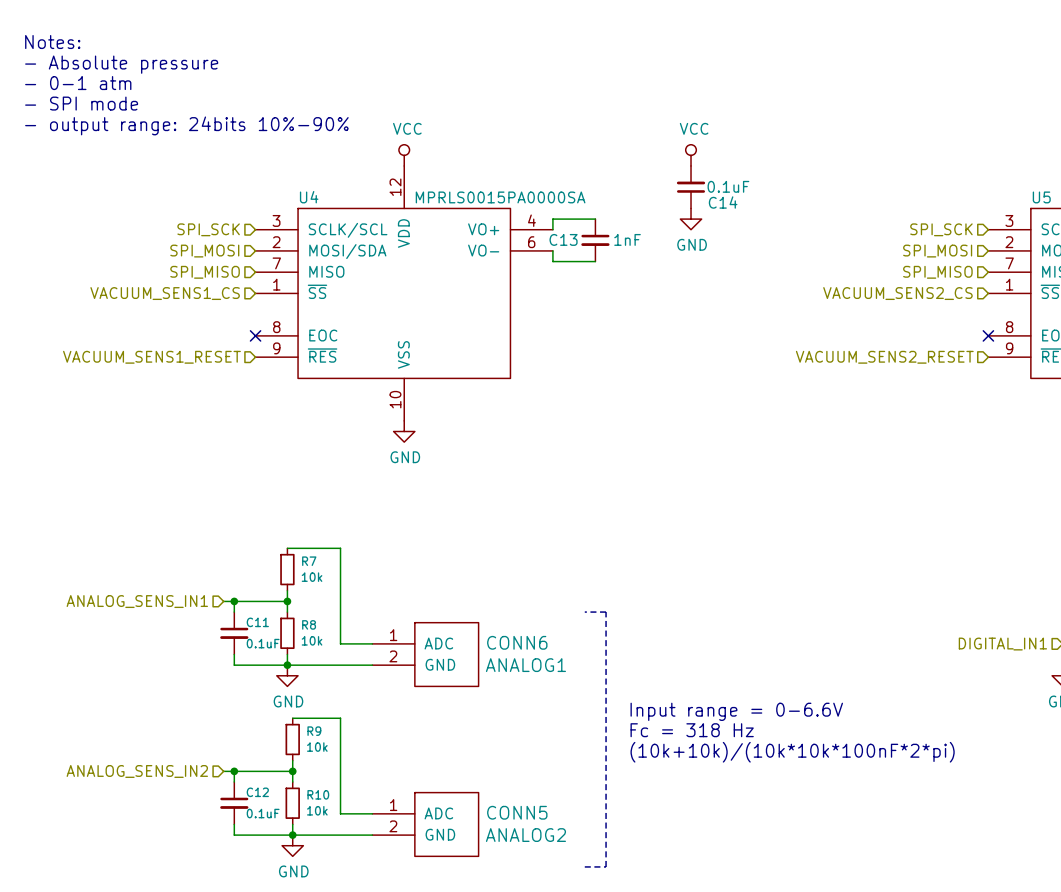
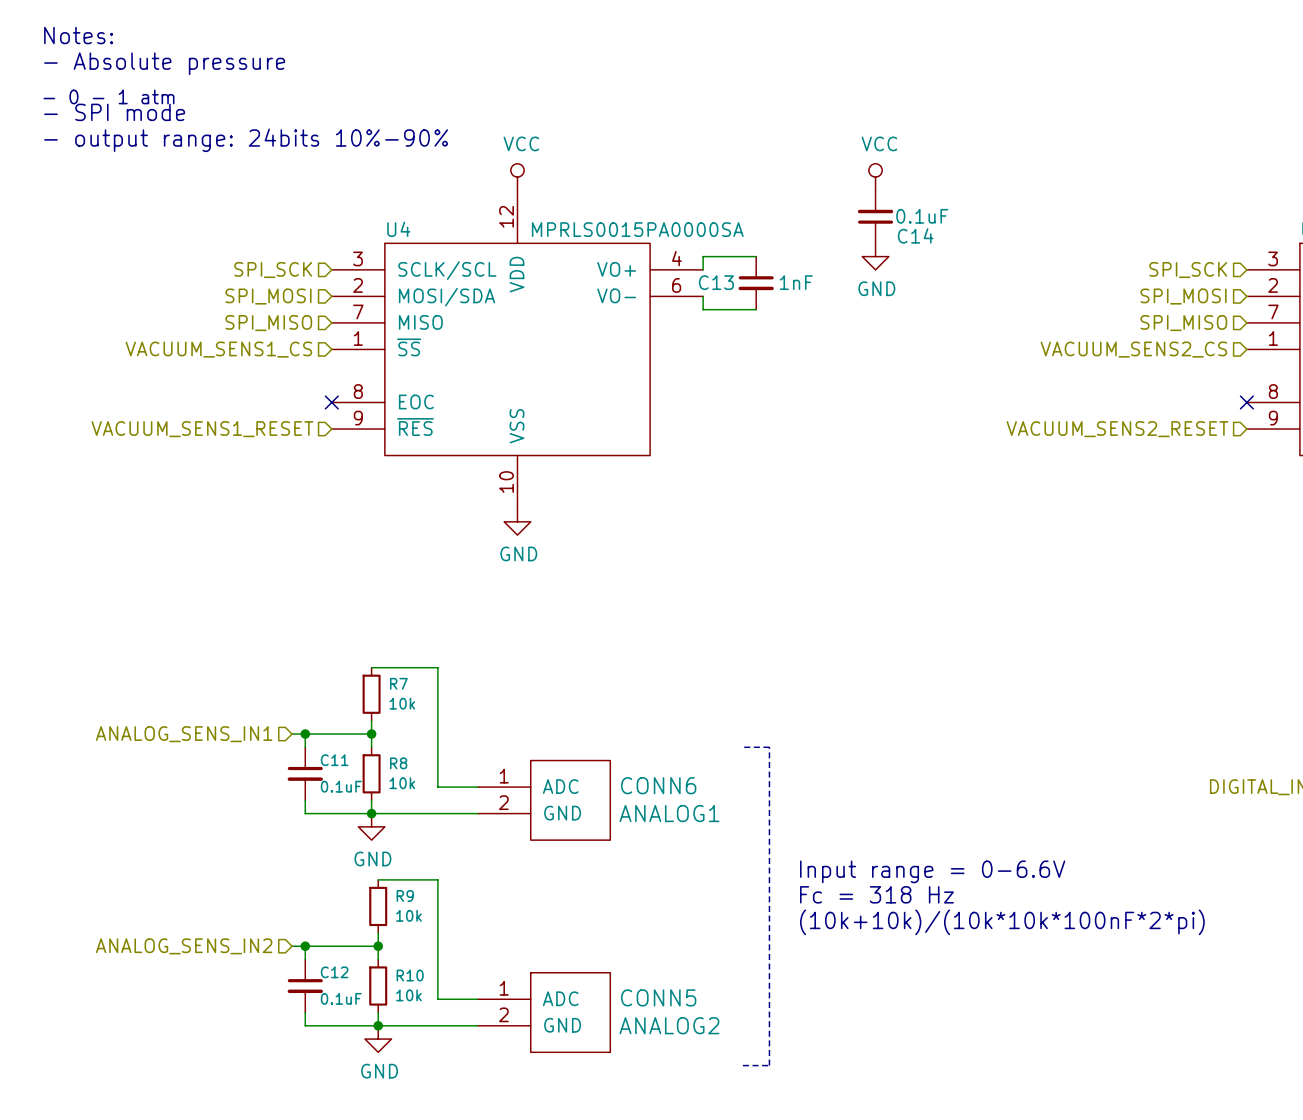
text: - 0-1 atm (78, 83) -> - 0 - 1 atm (108, 96)

